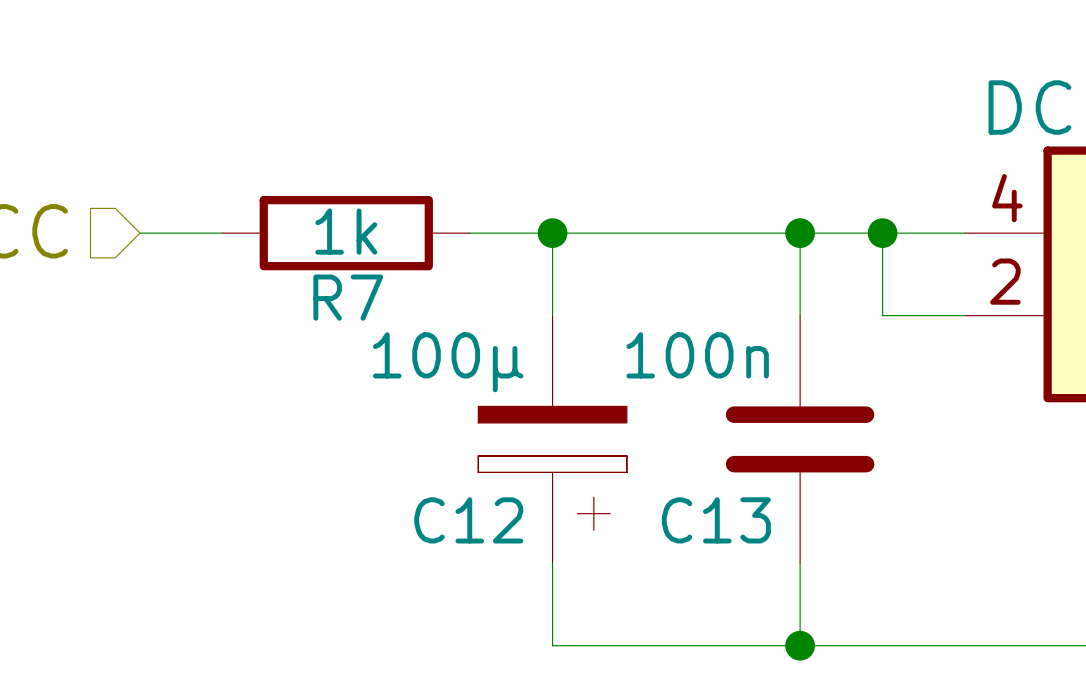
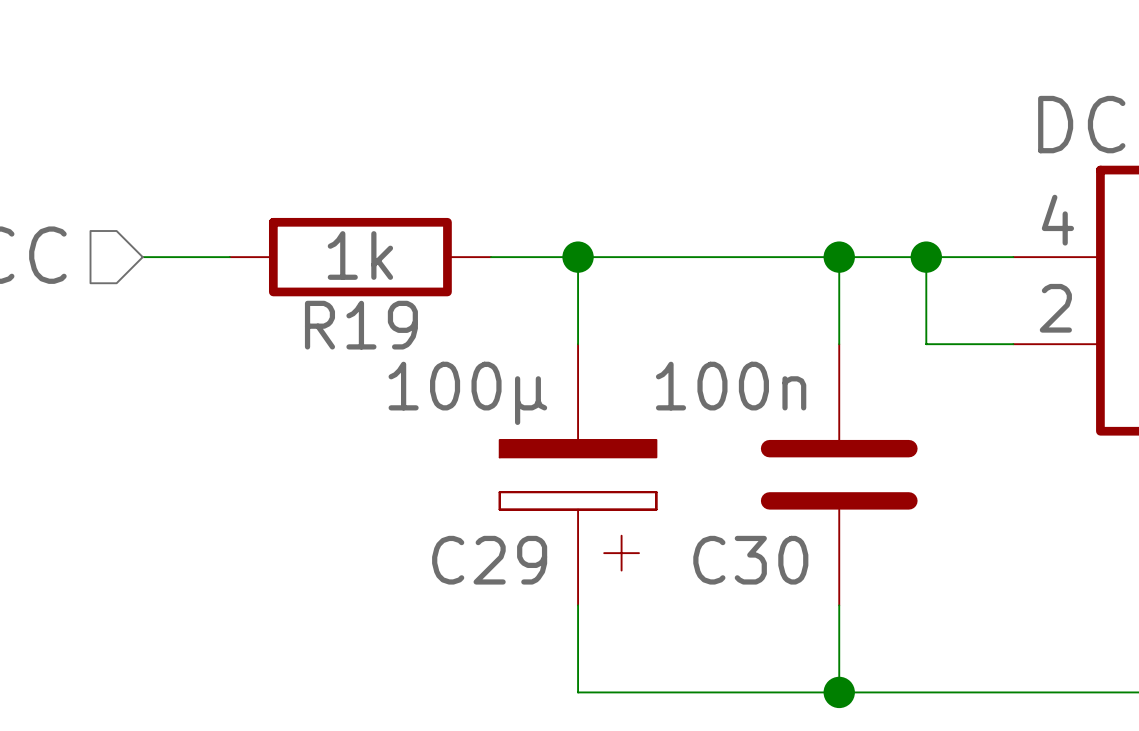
R7 name: R7 (348, 297) -> R19 (361, 325)
C12 name: C12 (468, 520) -> C29 (489, 560)
C13 name: C13 (716, 520) -> C30 (750, 560)

